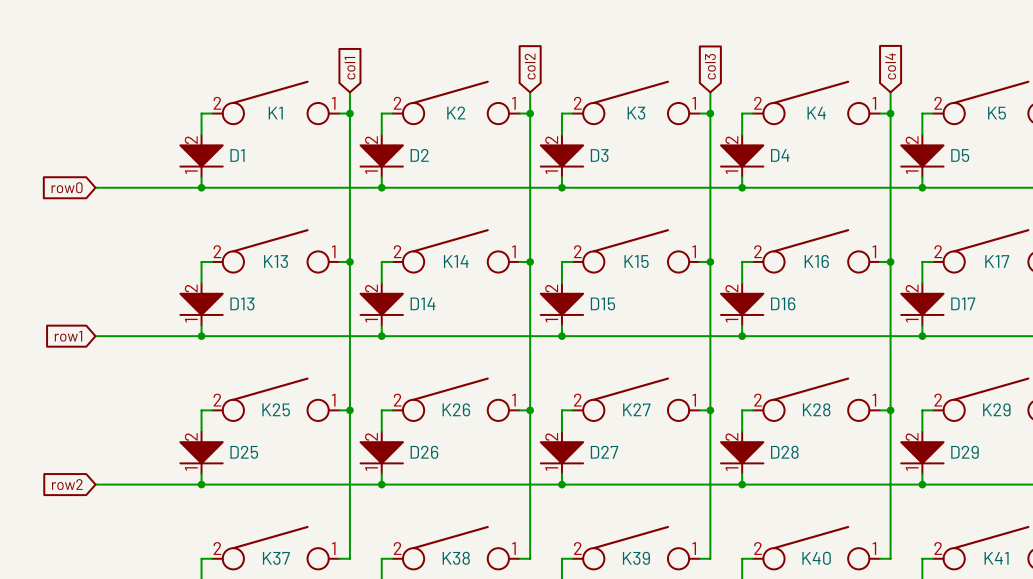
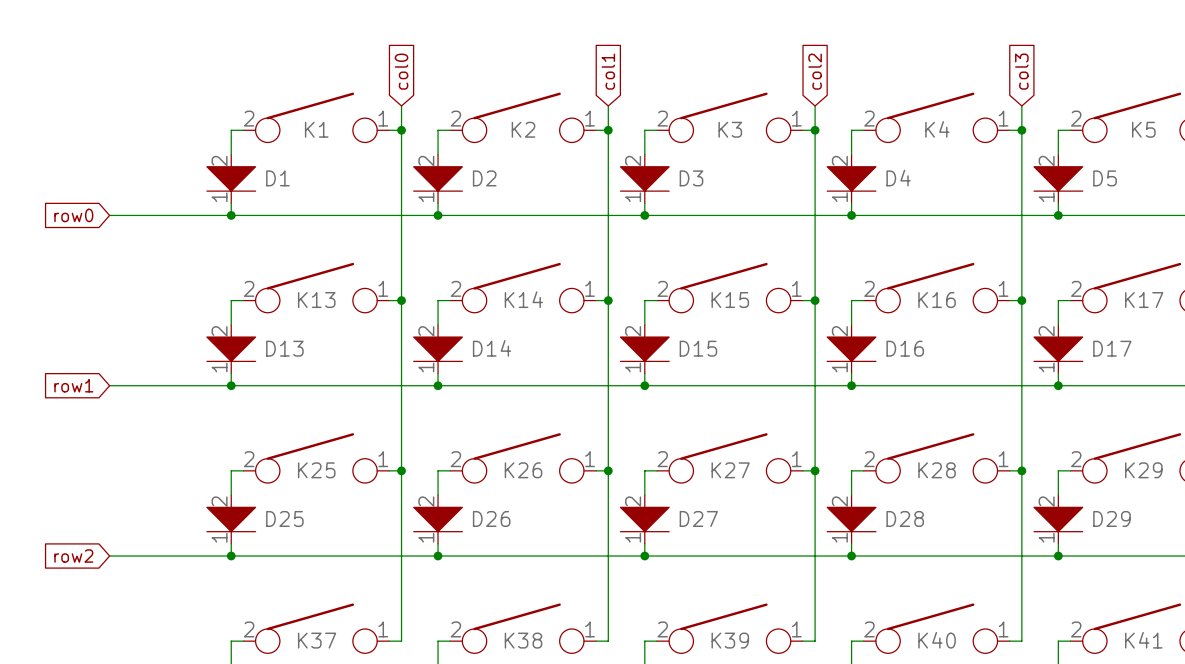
global label: col2 (530, 66) -> col1 (608, 71)
global label: col3 (710, 66) -> col2 (815, 71)
global label: col4 (890, 66) -> col3 (1021, 71)
global label: col1 (350, 68) -> col0 (401, 71)

